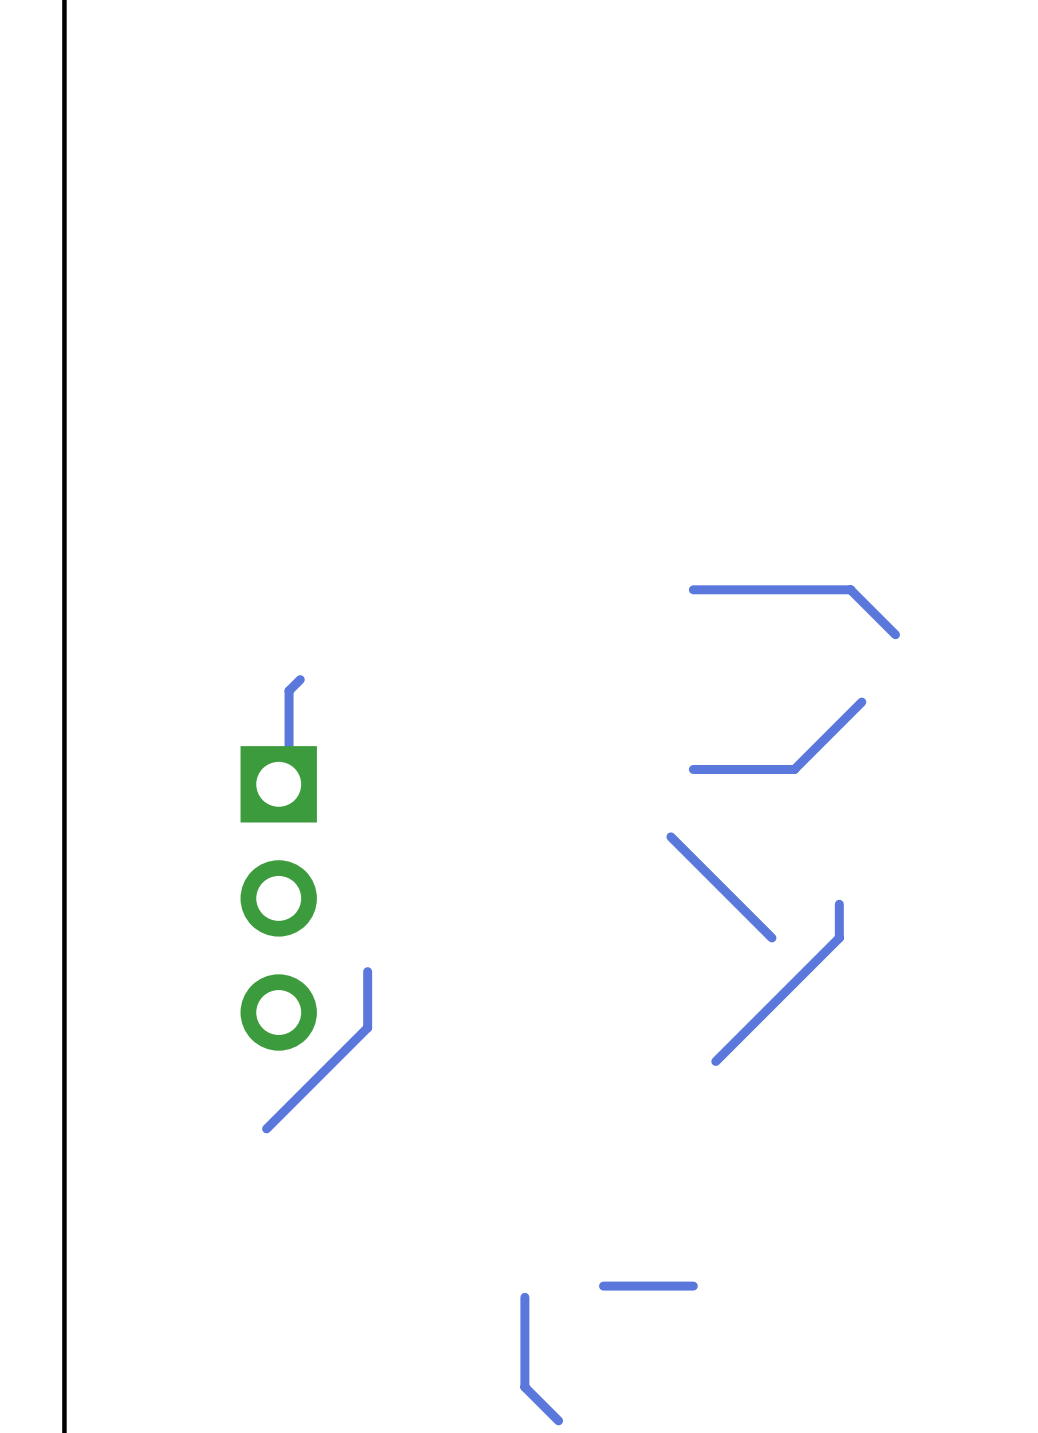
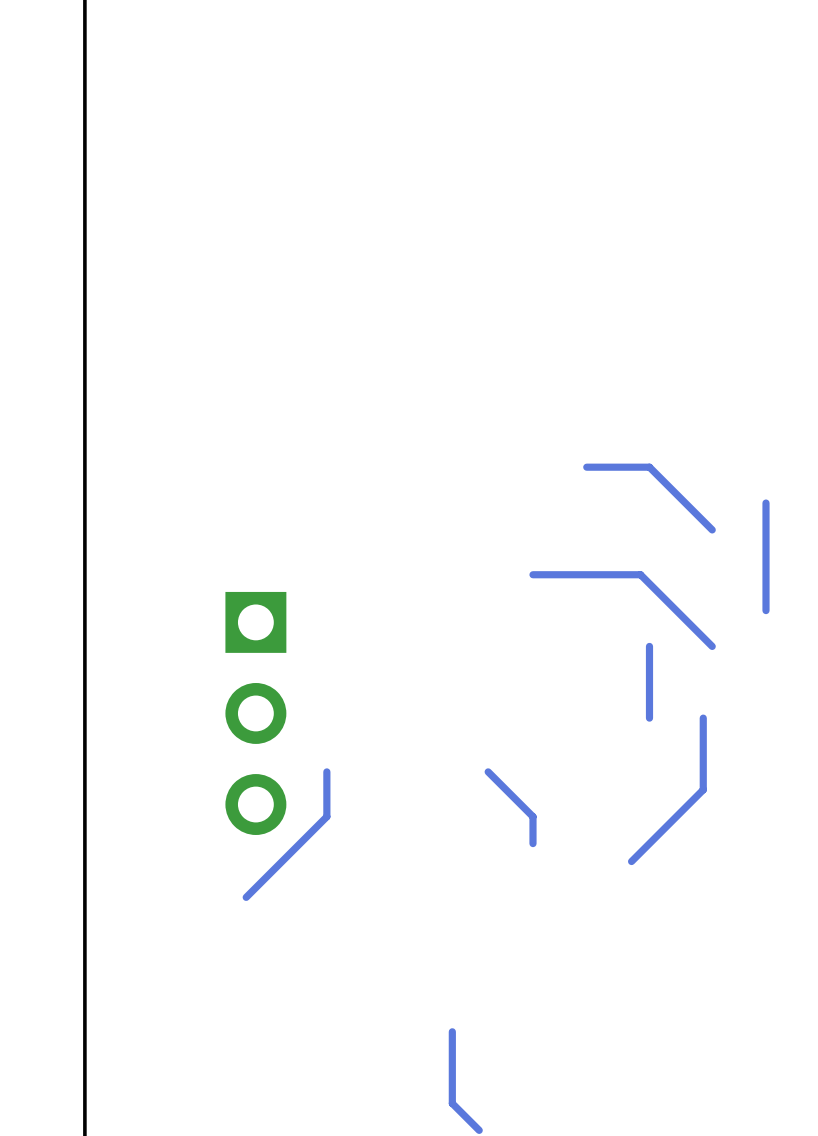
track: (771, 589) (850, 589) (895, 634) -> (649, 467) (712, 529)
track: none -> (766, 503) (766, 610)
track: (300, 679) (289, 690) (289, 791) -> none
track: (861, 702) (794, 769) (693, 769) -> none
track: none -> (532, 574) (640, 574) (712, 646)
track: none -> (649, 646) (649, 718)
track: (670, 836) (771, 937) -> none
track: (839, 937) (715, 1061) -> (703, 745) (703, 789) (631, 861)
track: none -> (488, 771) (532, 816) (532, 843)
track: (693, 1286) (603, 1286) -> none

